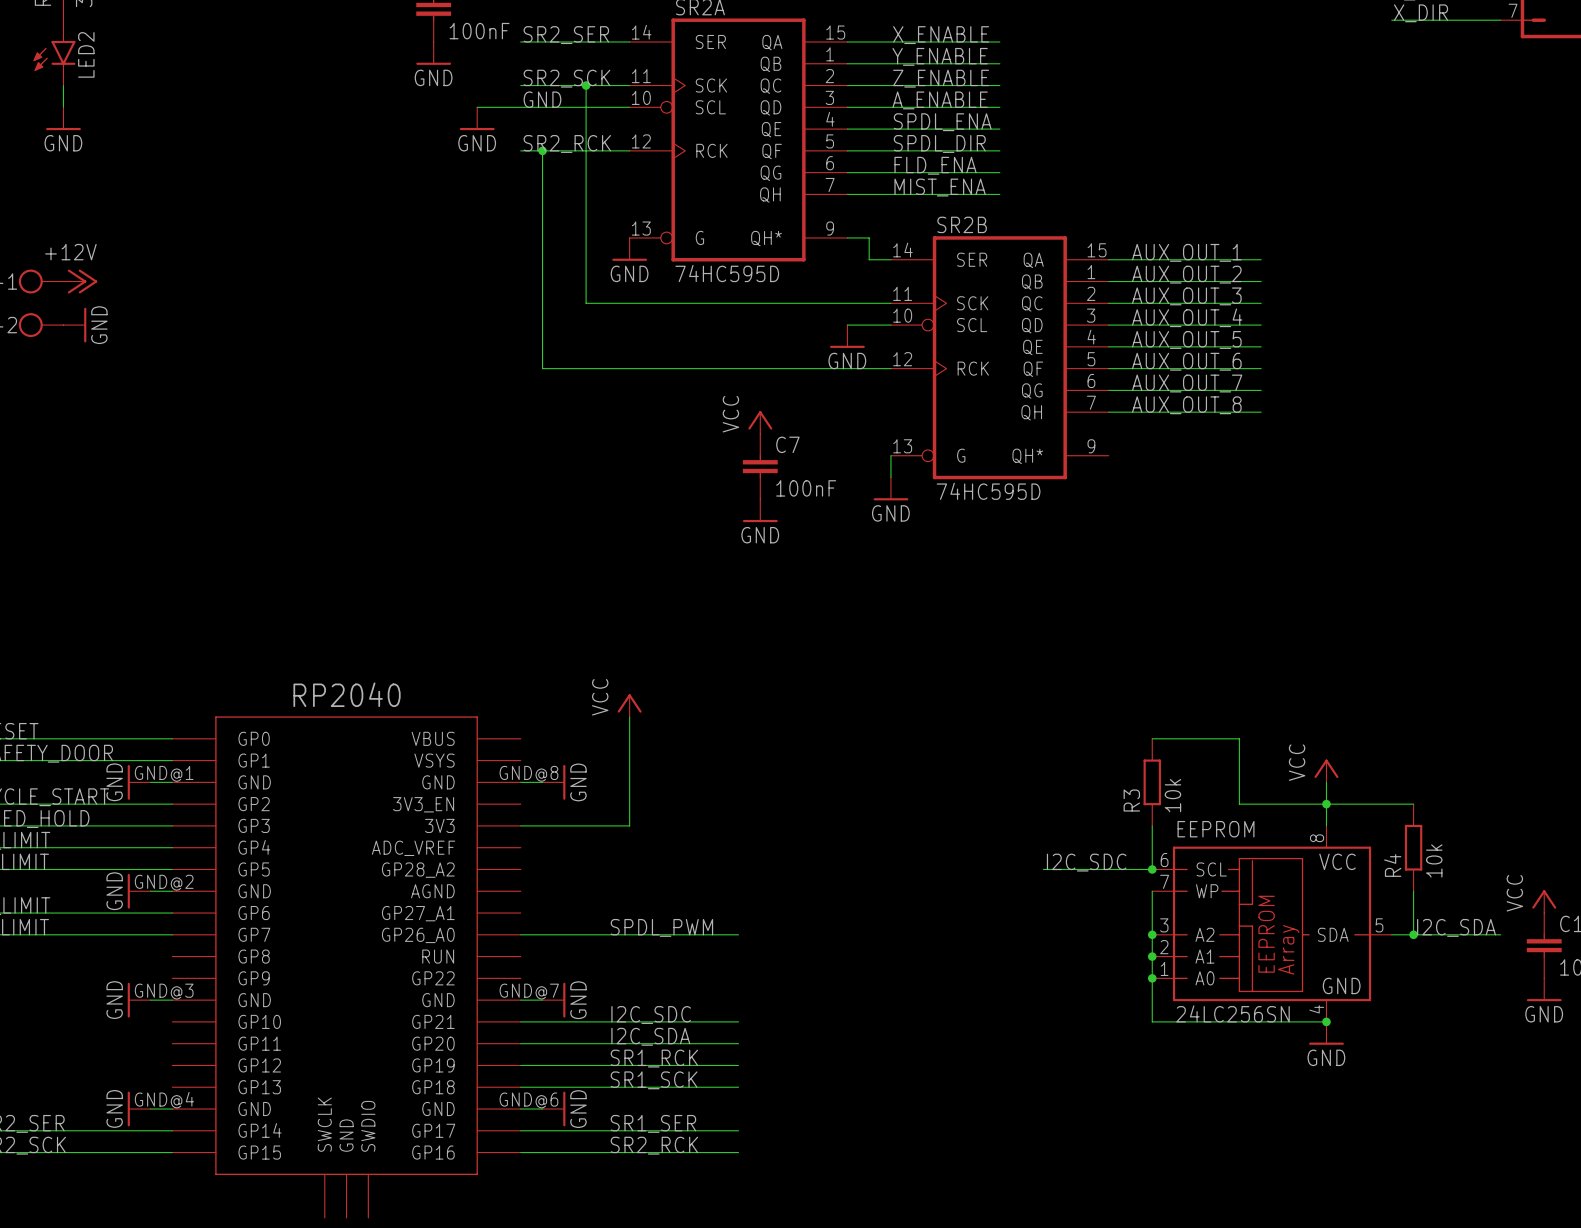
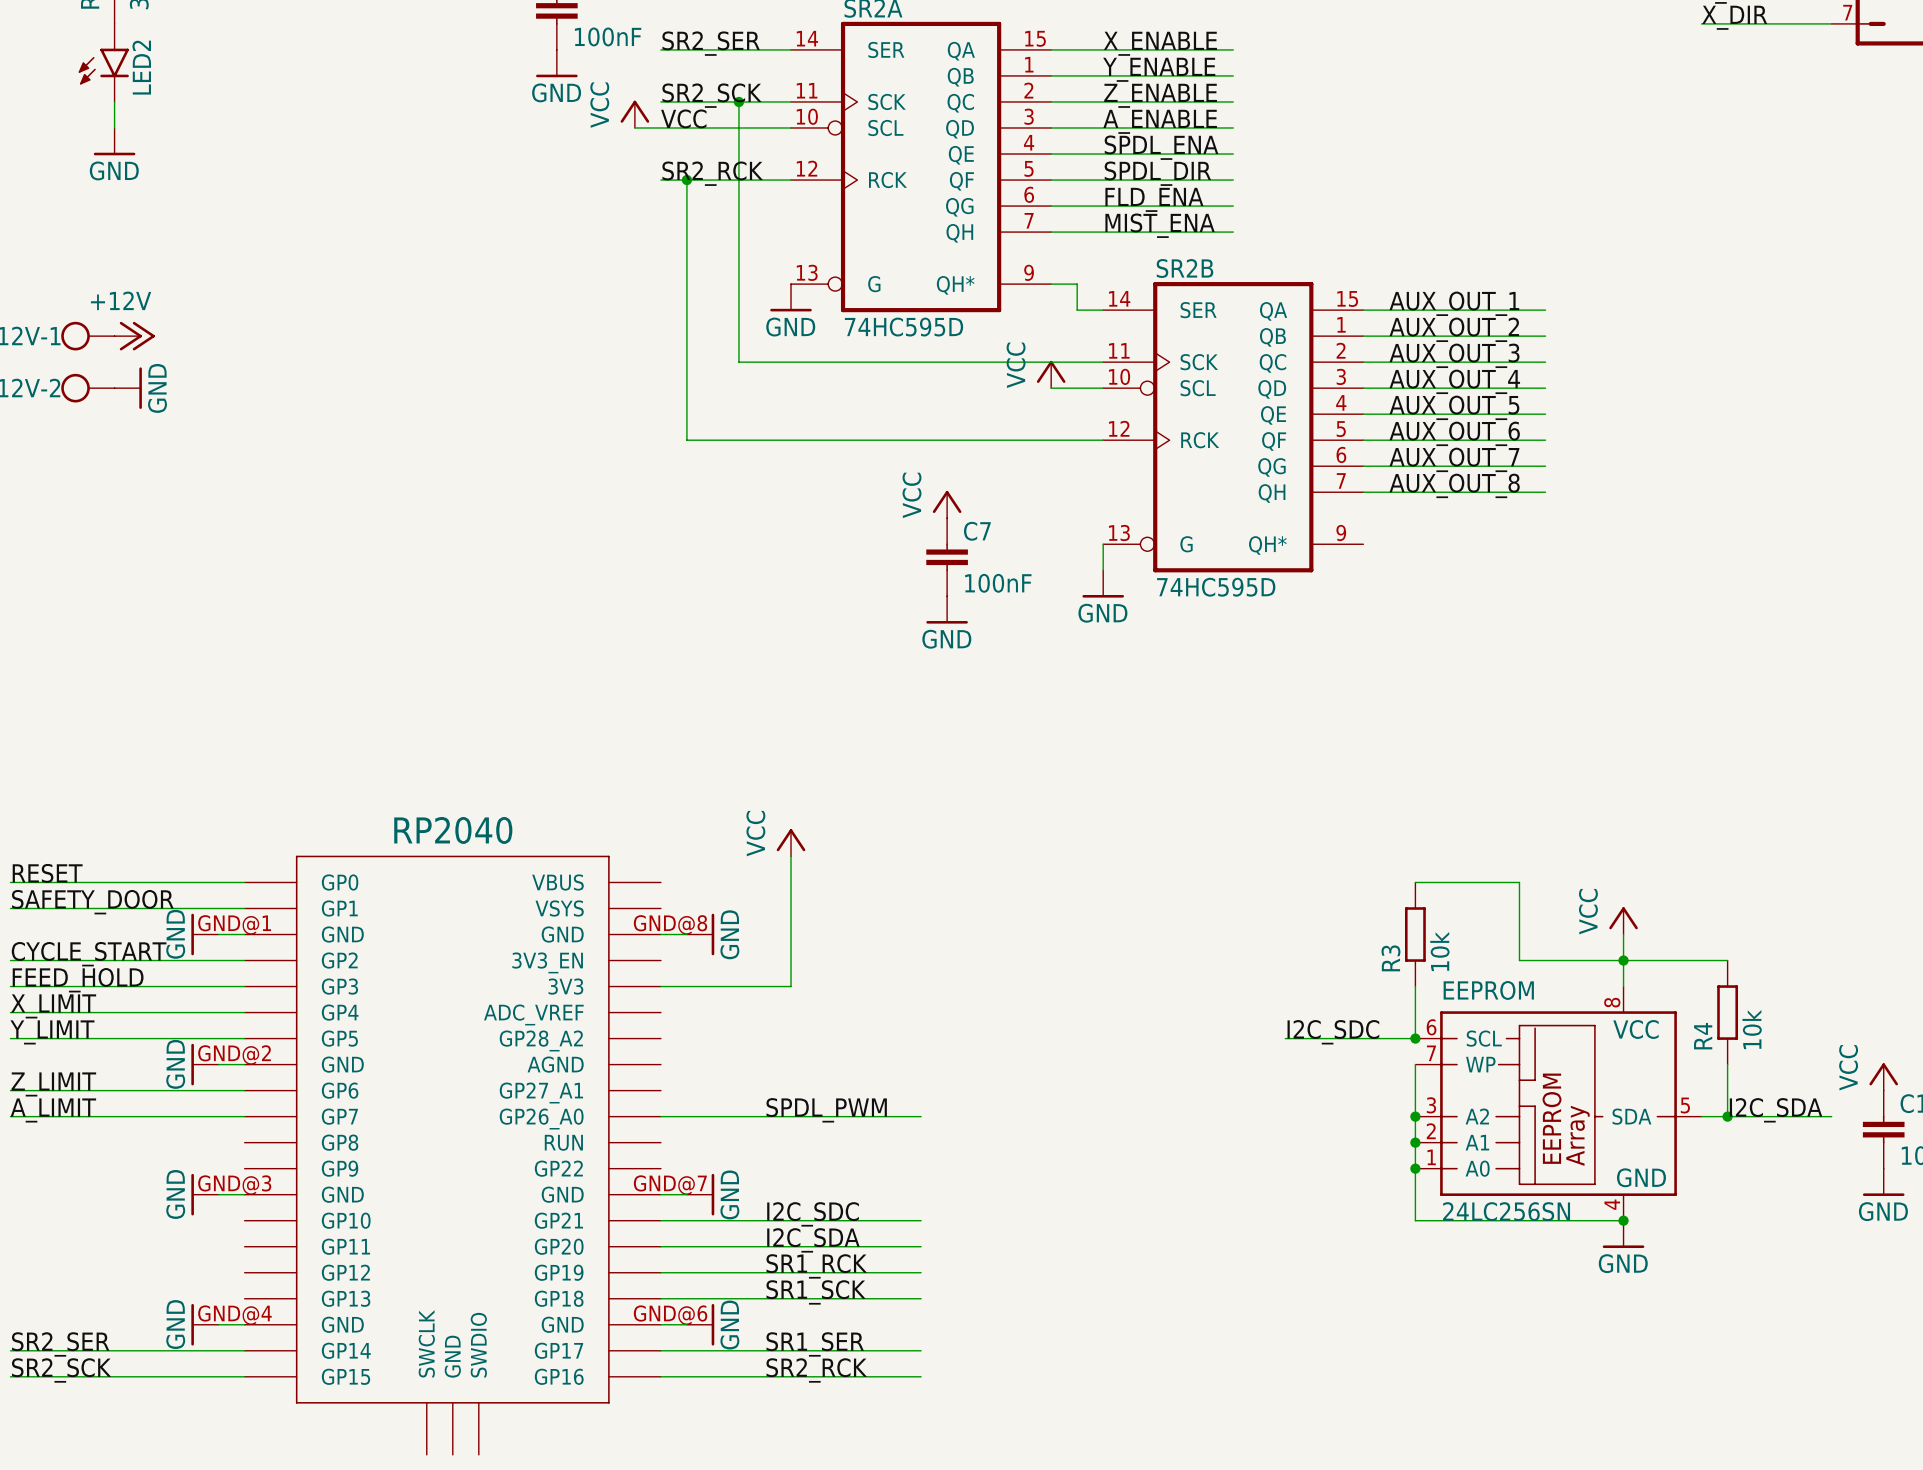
power symbol: none -> VCC (634, 114)
label: GND (542, 99) -> VCC (683, 118)
wire: (477, 107) (498, 107) -> none
power symbol: GND (477, 118) -> none
power symbol: none -> VCC (1051, 374)
power symbol: GND (847, 336) -> none

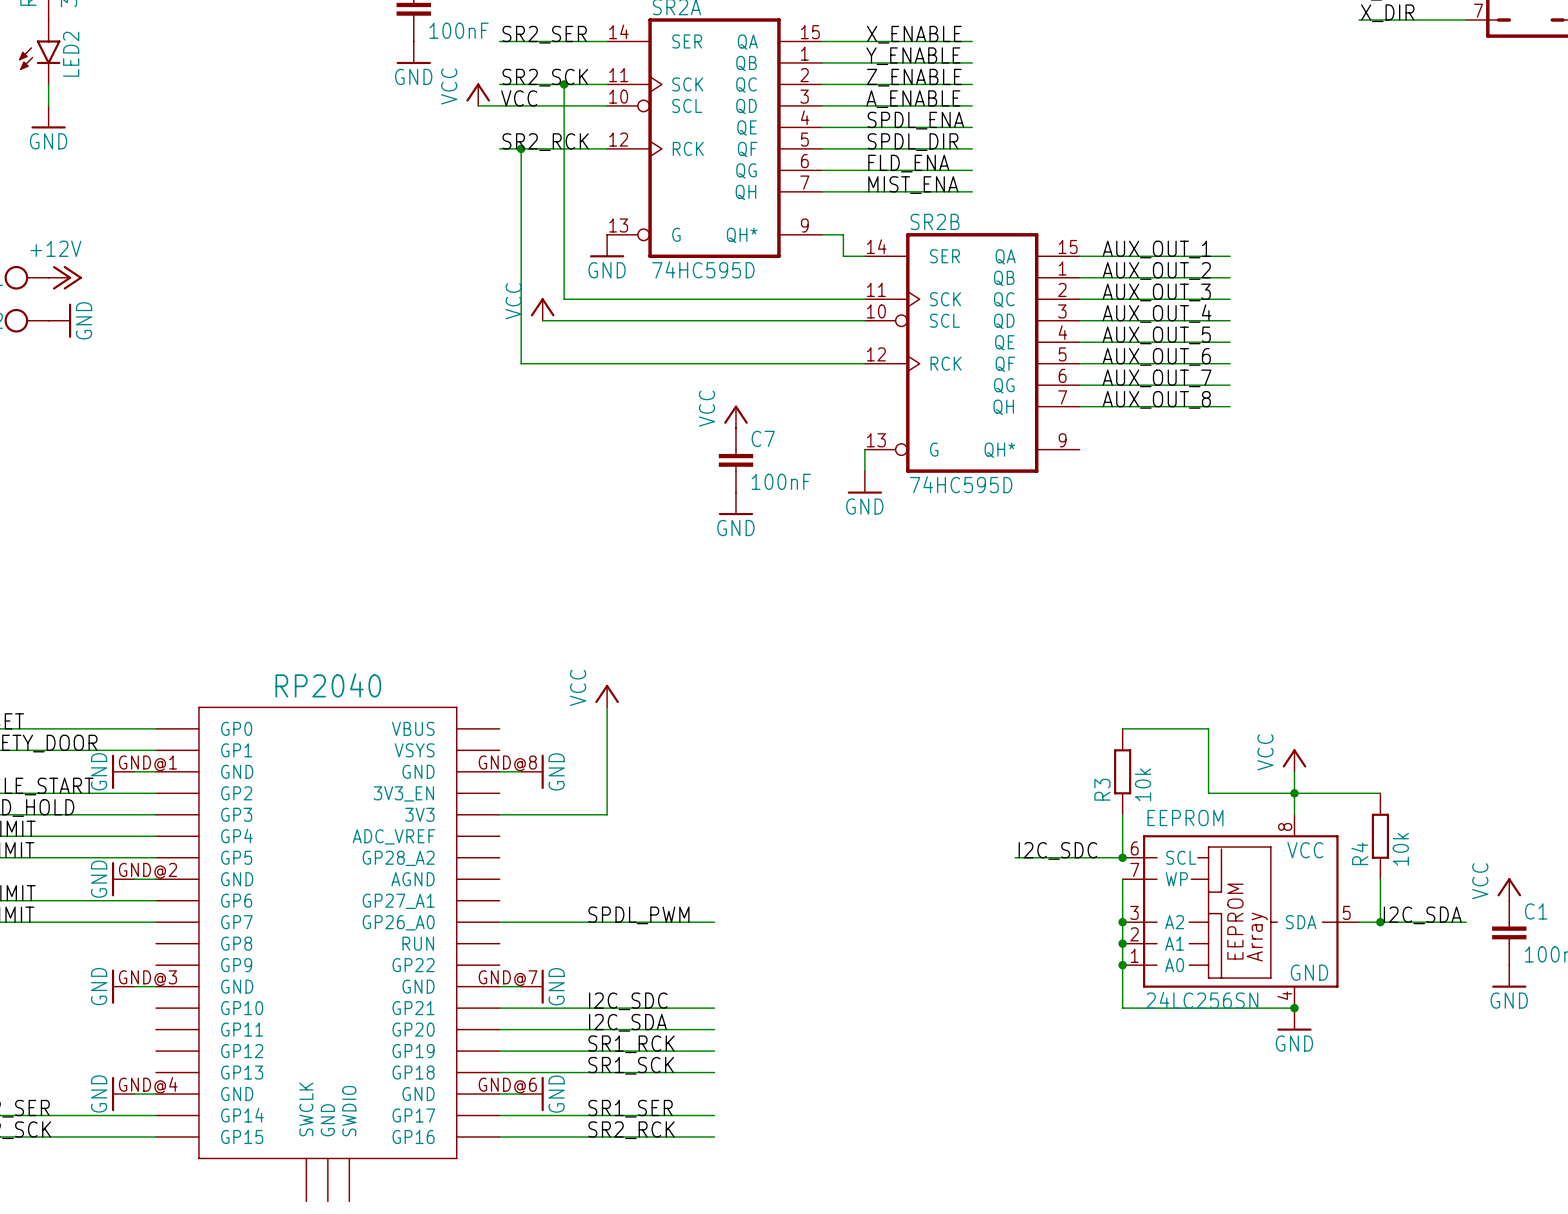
power symbol: none -> VCC (542, 309)
power symbol: VCC (1051, 374) -> none
wire: none -> (542, 320) (821, 320)

